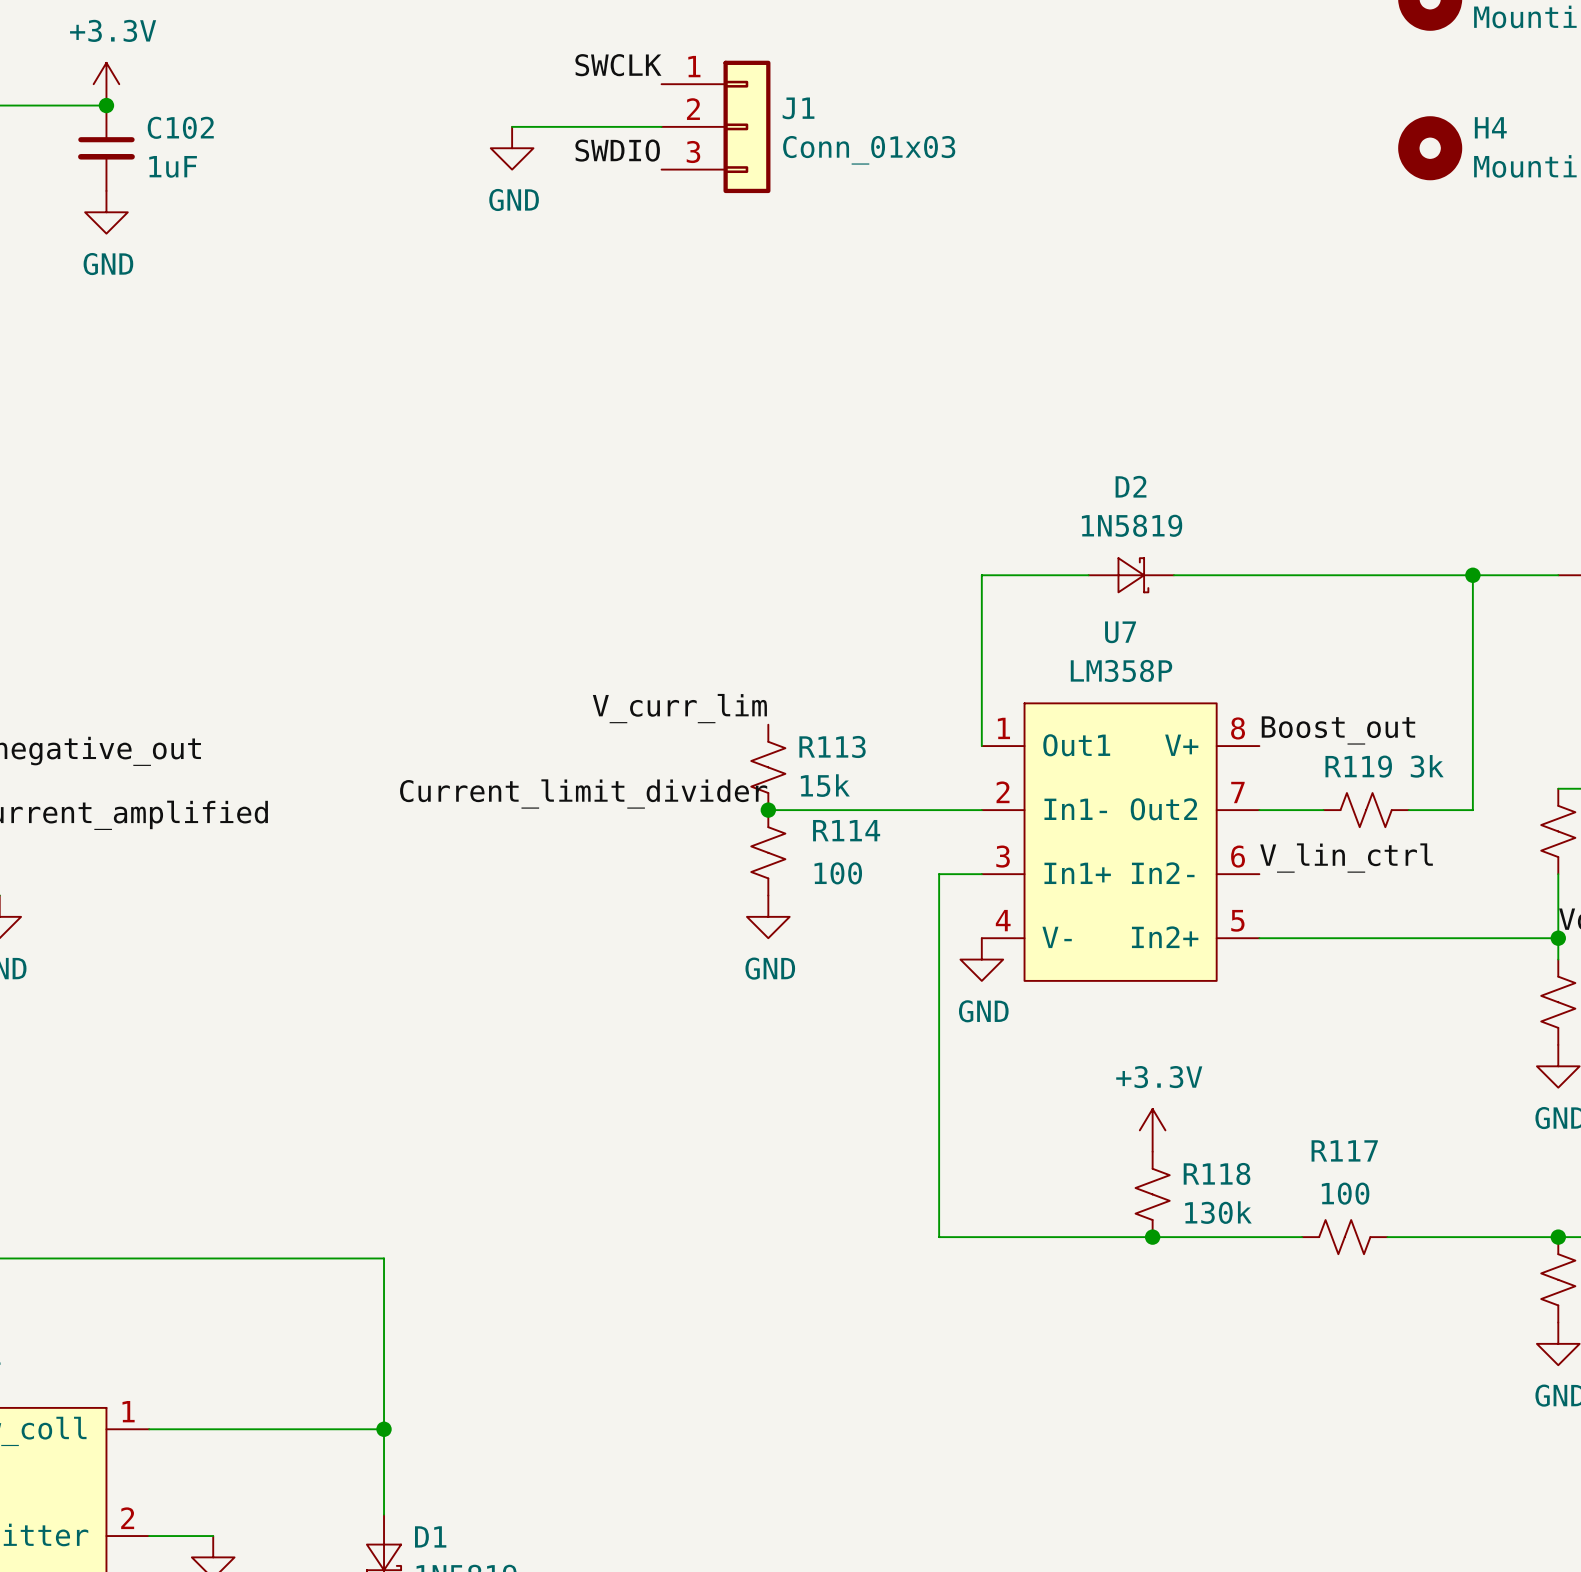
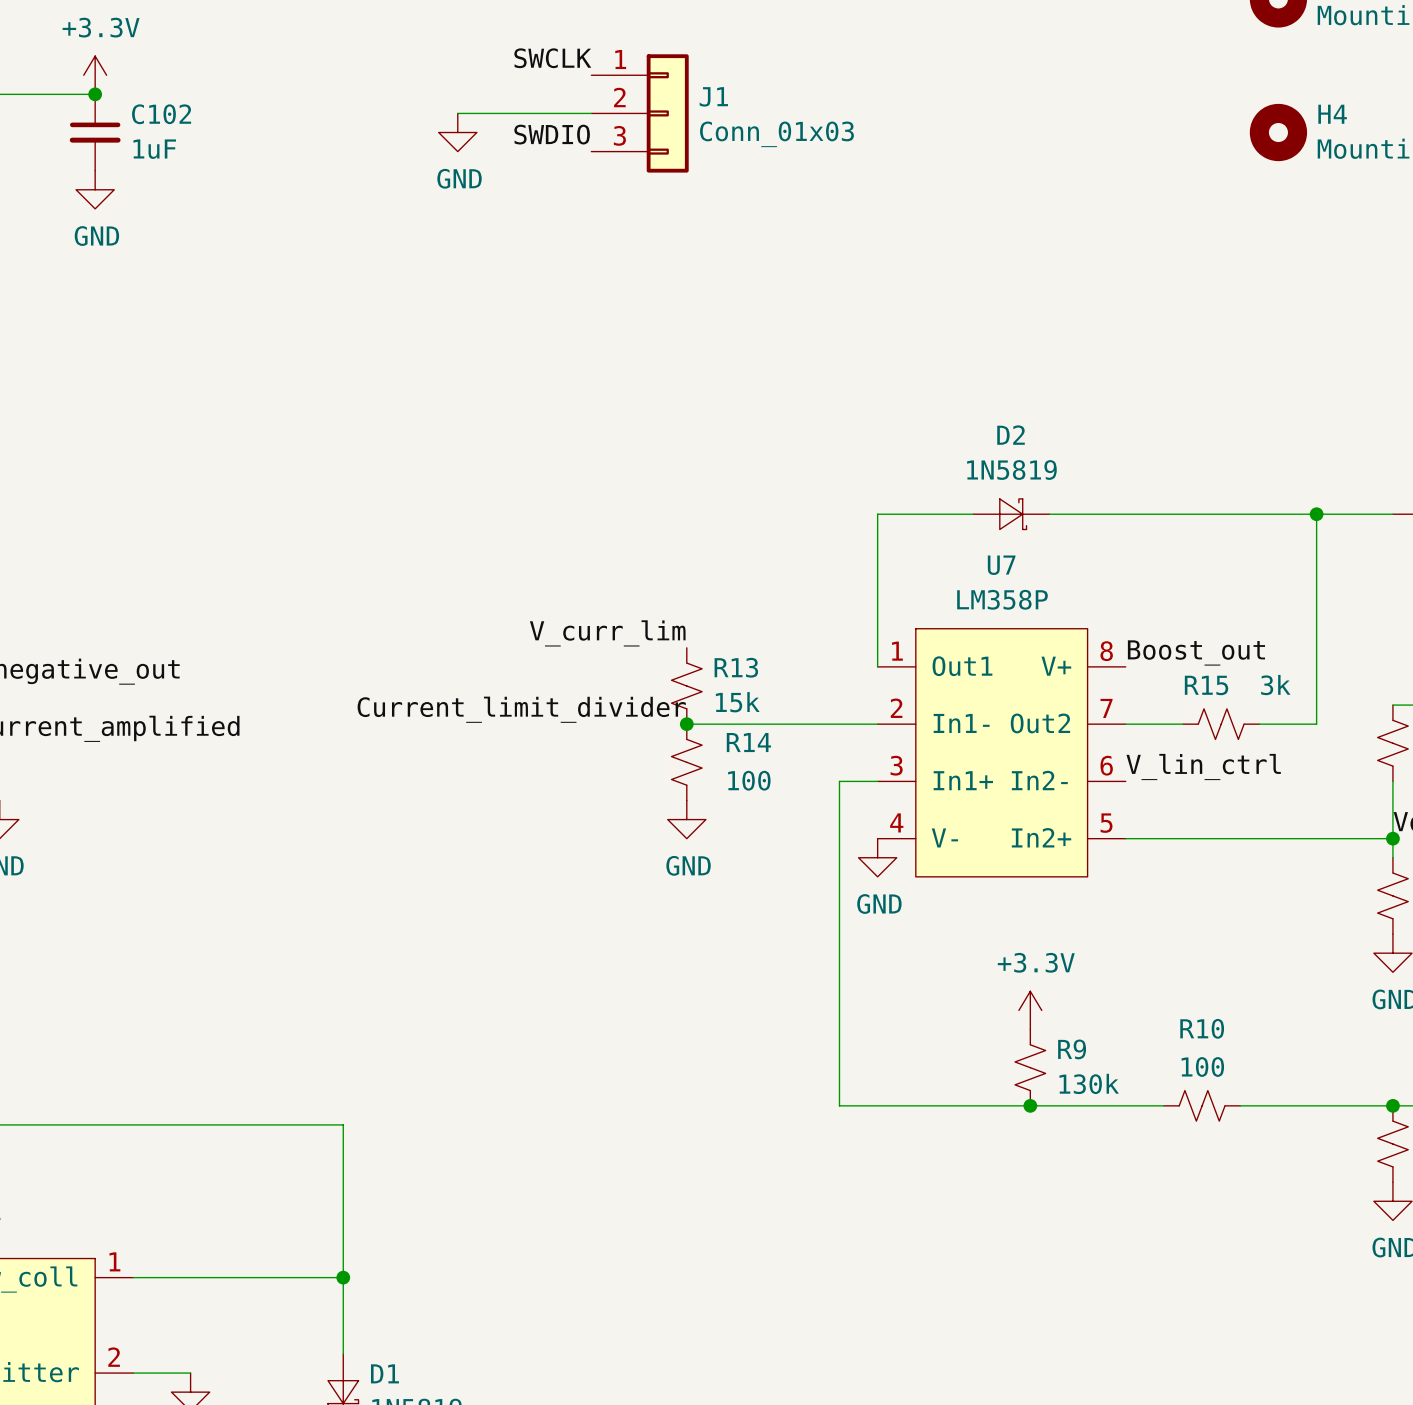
R113 name: R113 (832, 746) -> R13 (736, 667)
R119 name: R119 (1358, 766) -> R15 (1206, 685)
R114 name: R114 (846, 830) -> R14 (748, 742)
R117 name: R117 (1344, 1150) -> R10 (1202, 1028)
R118 name: R118 (1217, 1173) -> R9 (1072, 1049)

